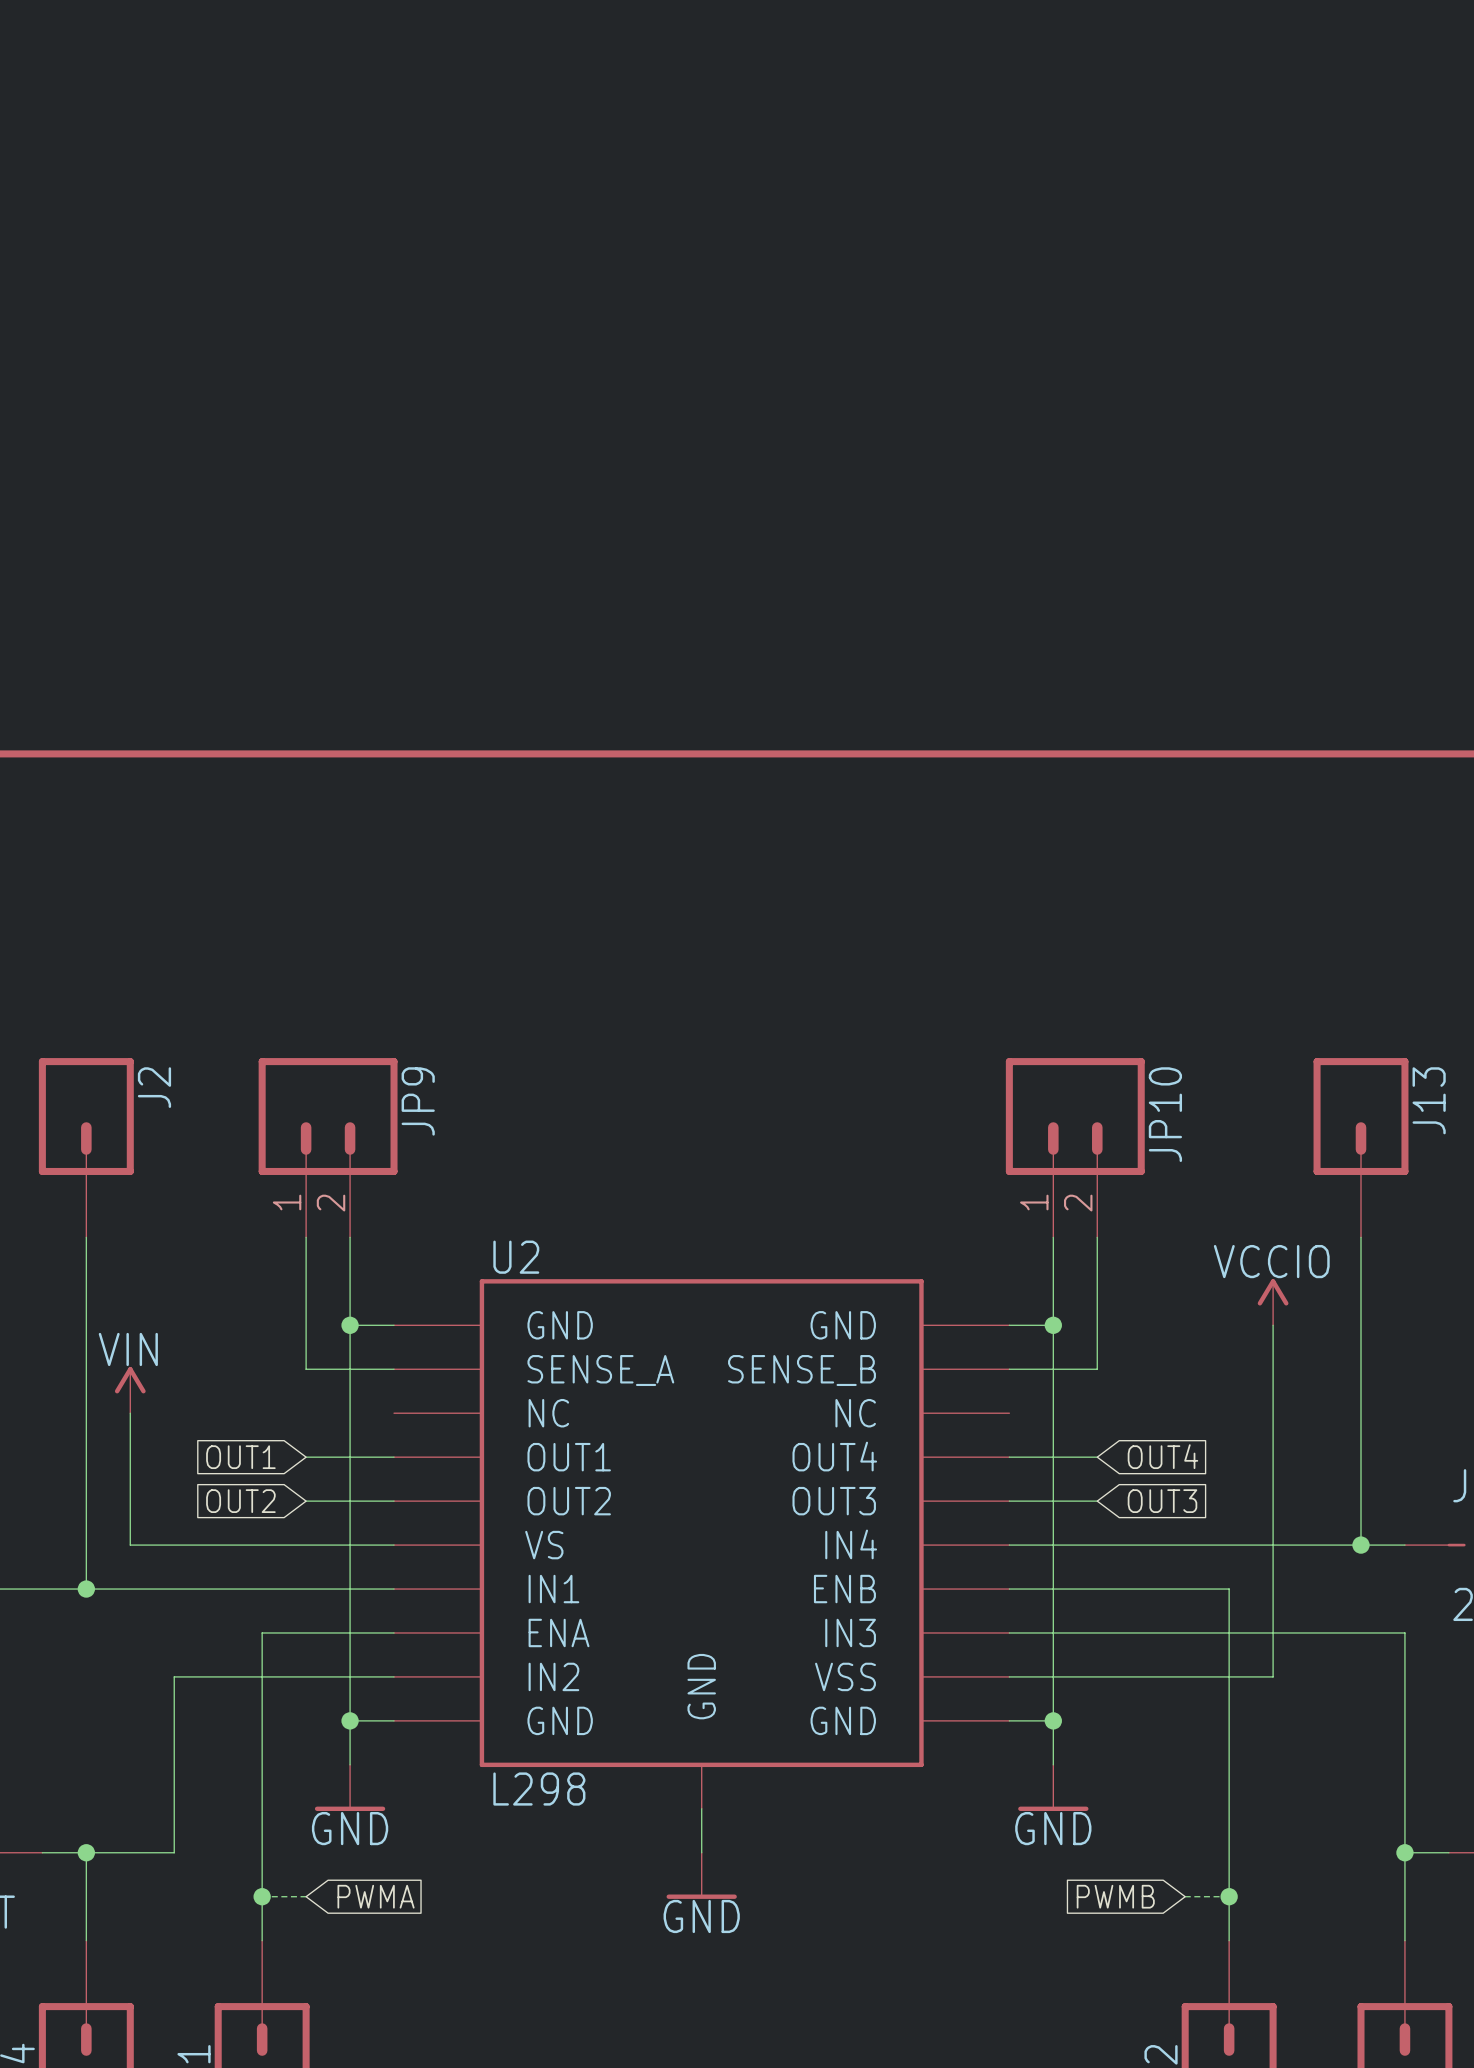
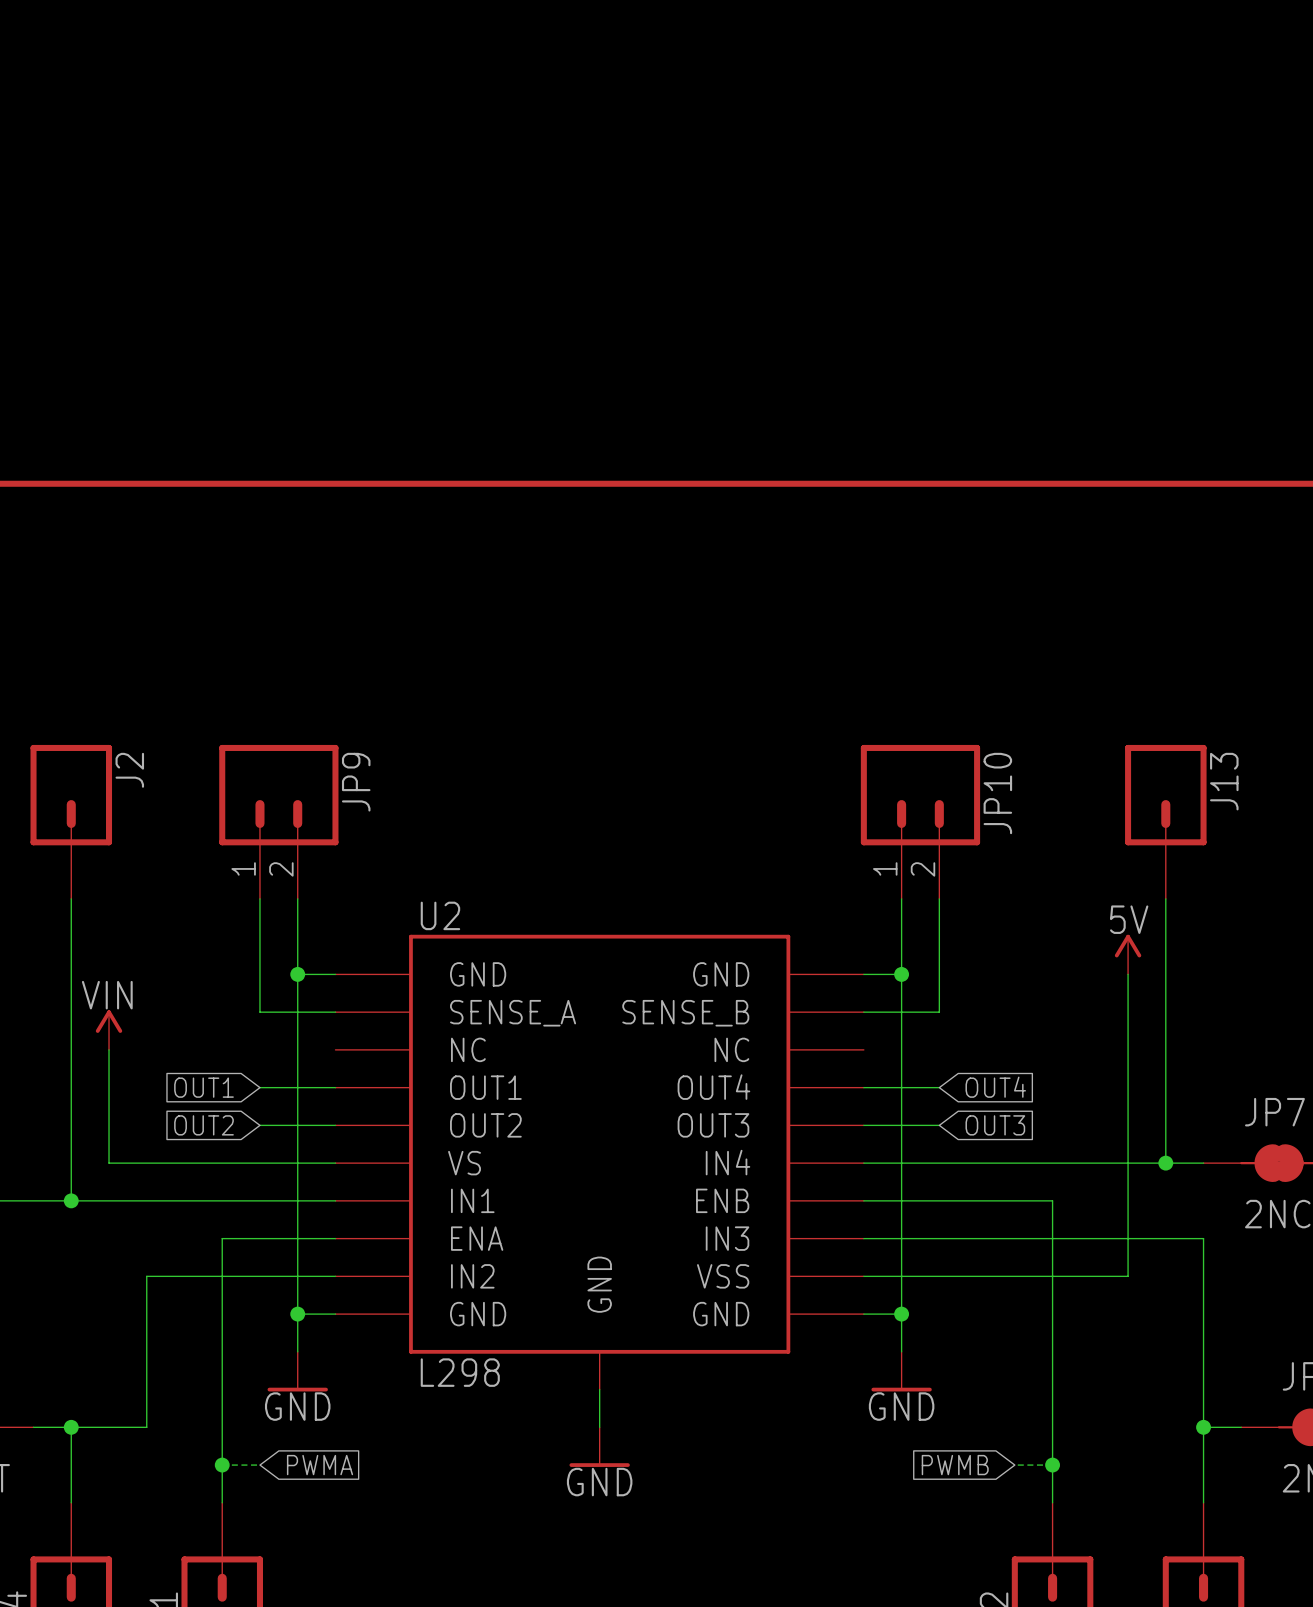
power symbol: VCCIO (1273, 1302) -> none
power symbol: none -> 5V (1128, 954)
wire: (1273, 1325) (1273, 1676) -> (1128, 974) (1128, 1276) (1090, 1276)

